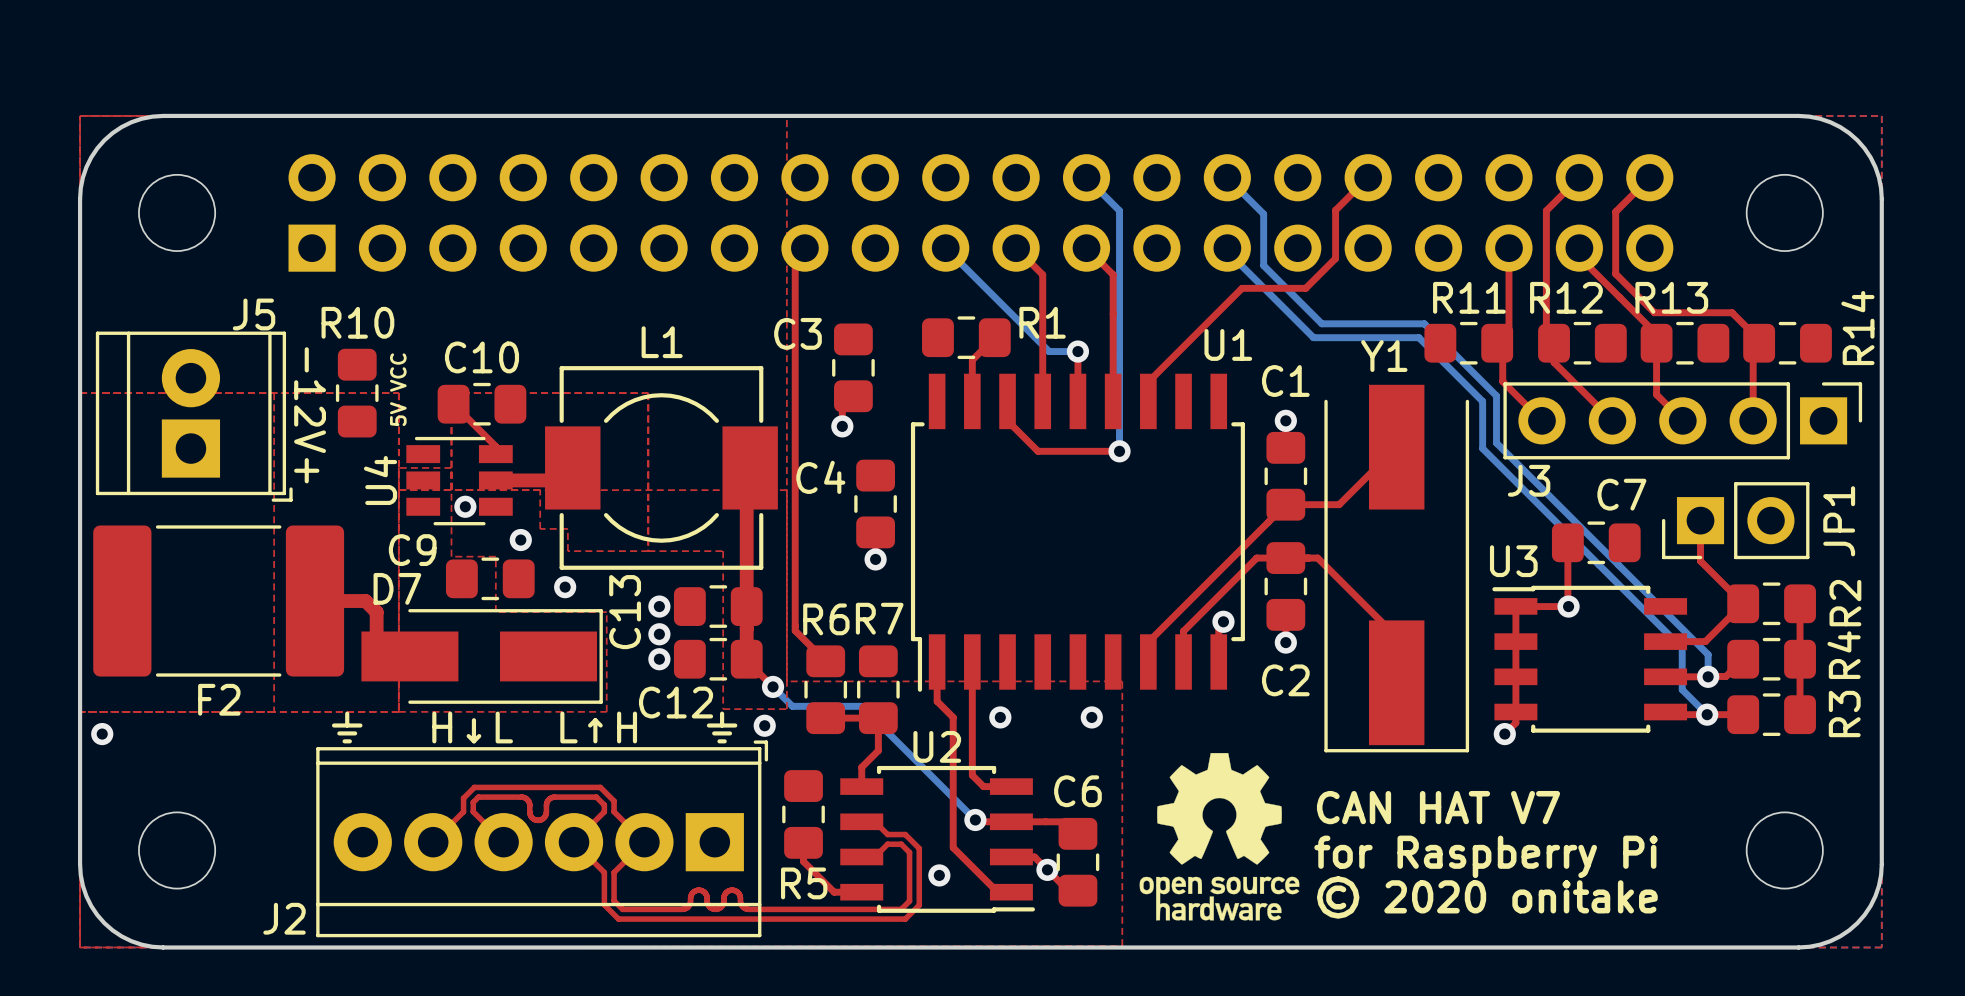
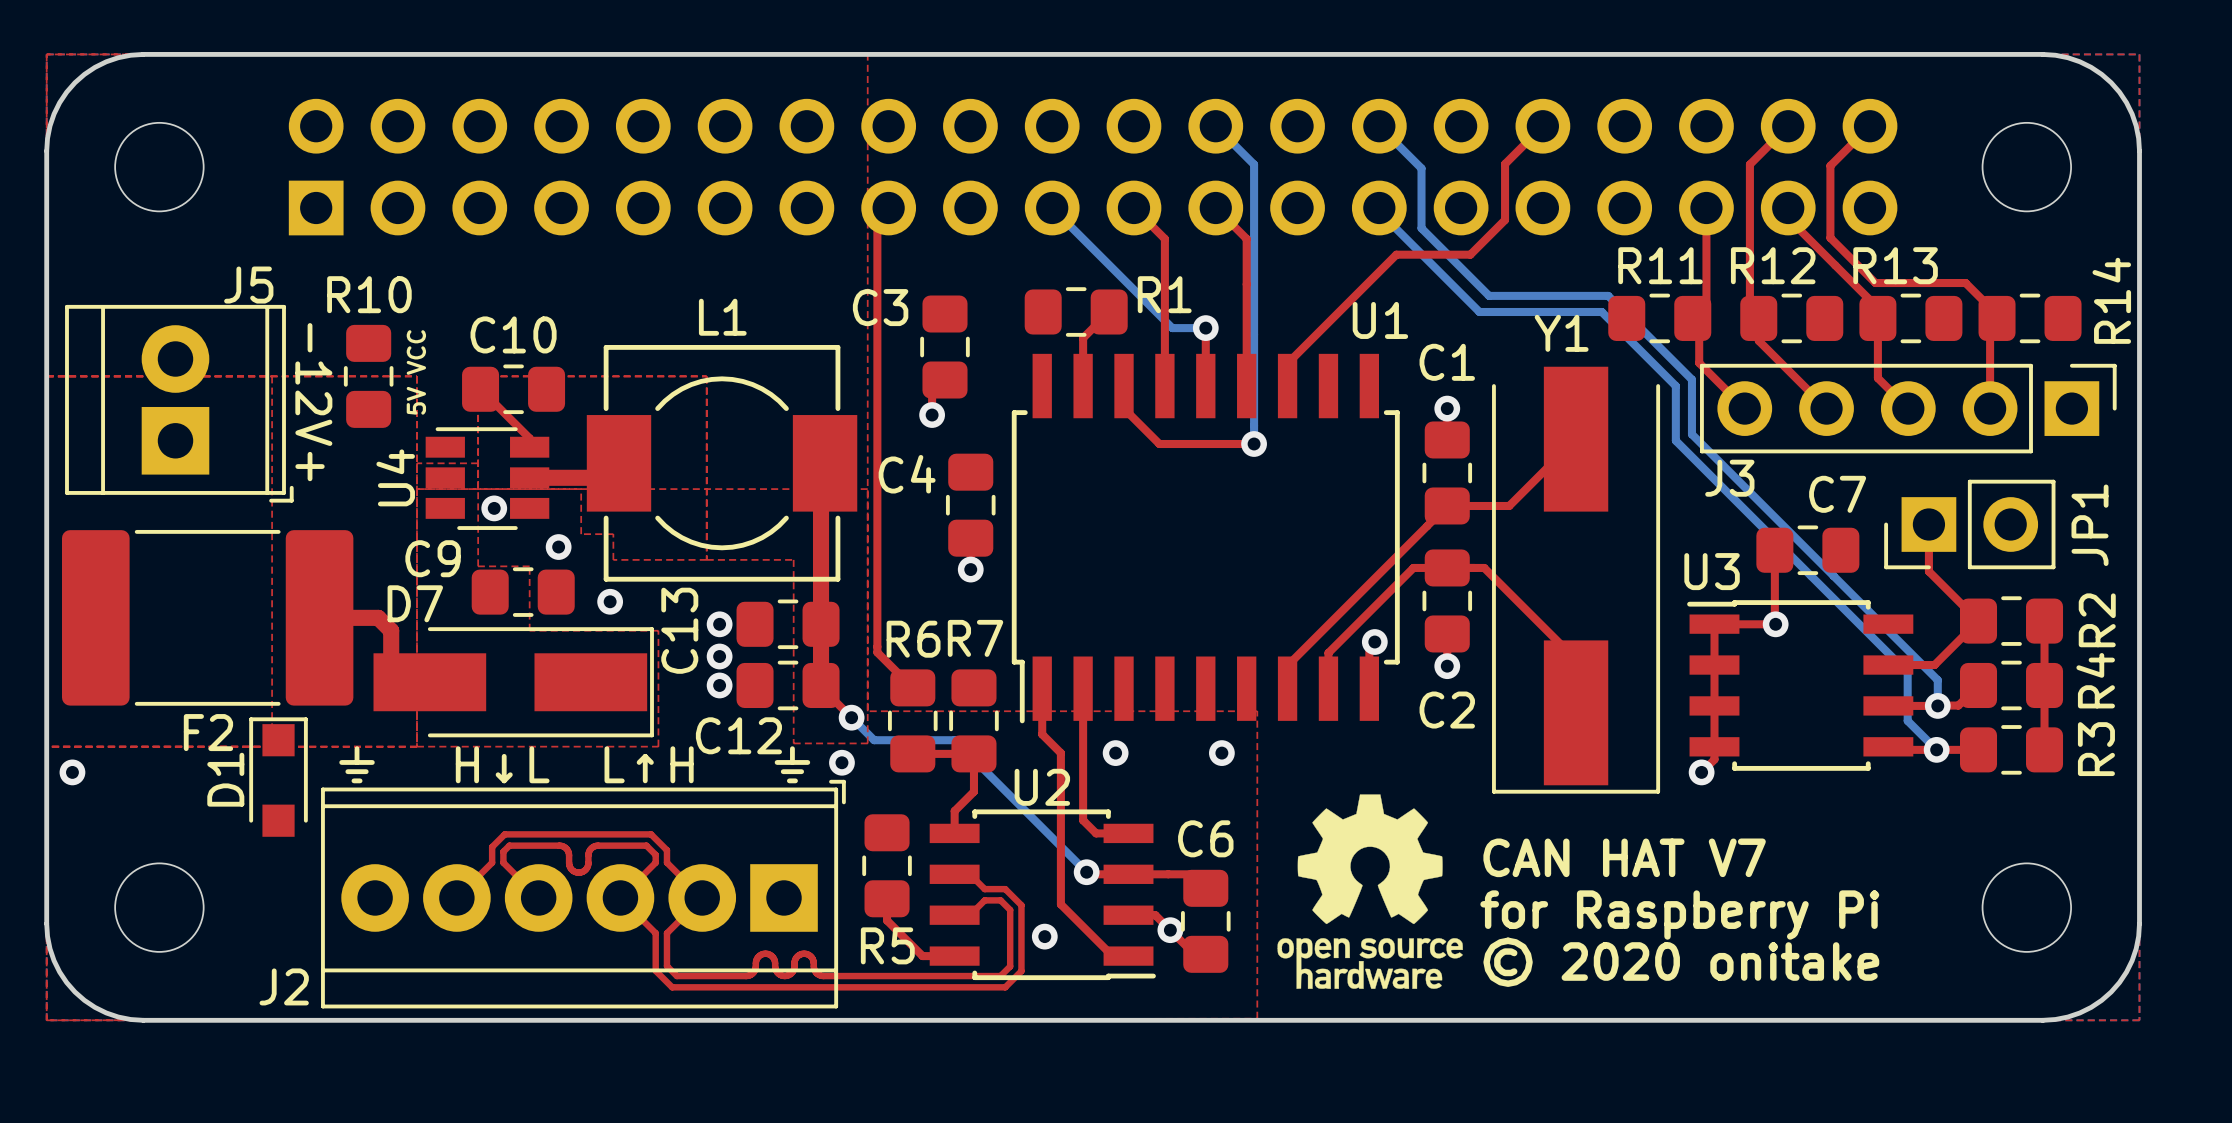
D1: none -> (278, 777)

